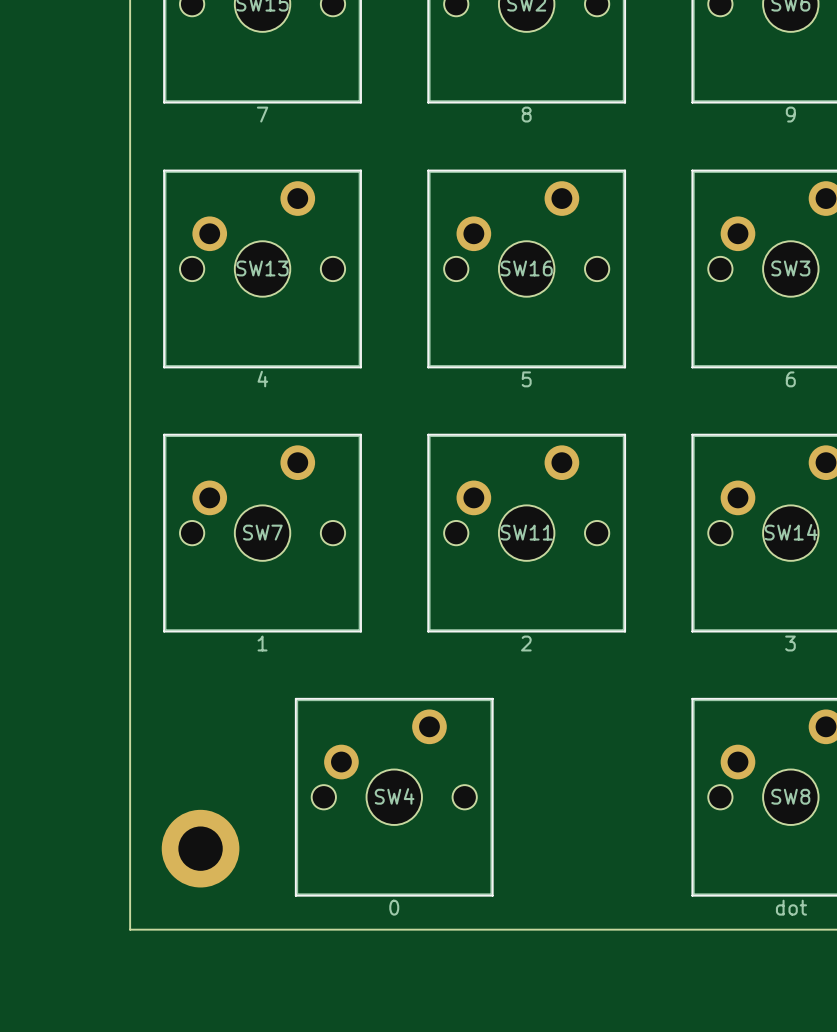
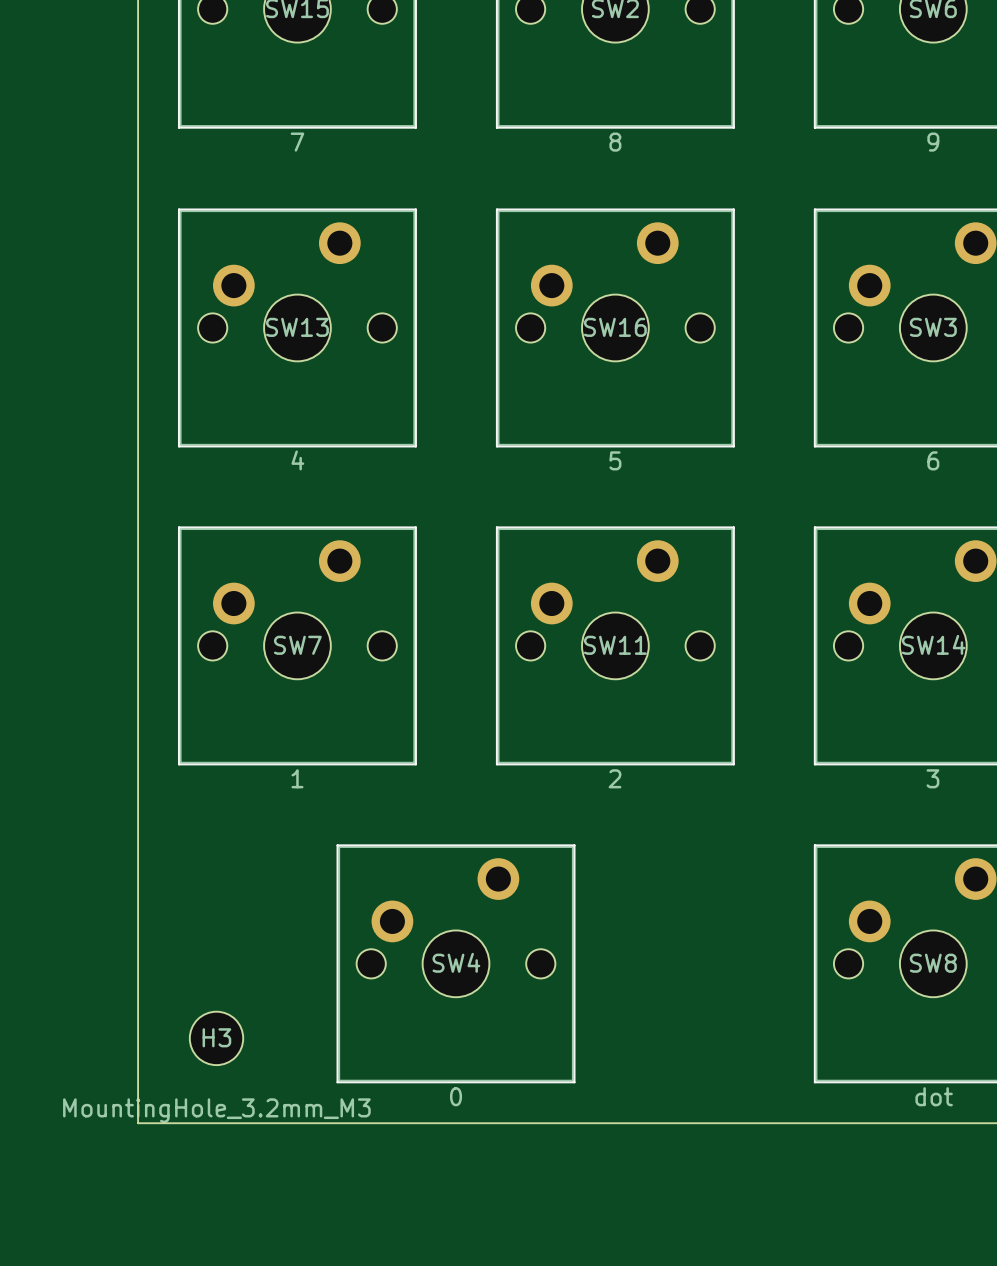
part: (200, 848) -> none
H3: none -> MountingHole_3.2mm_M3 (216, 1038)

